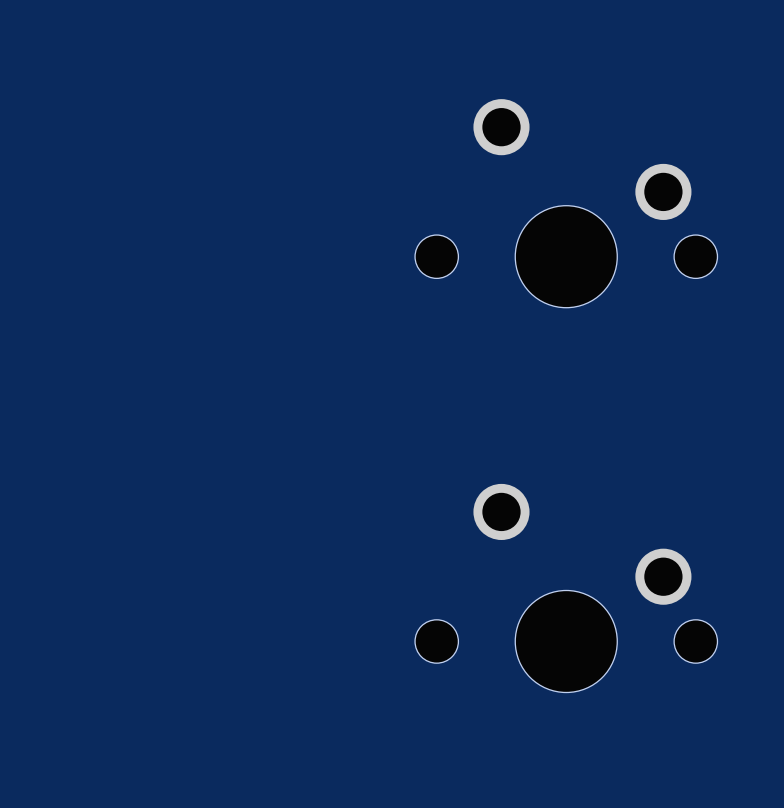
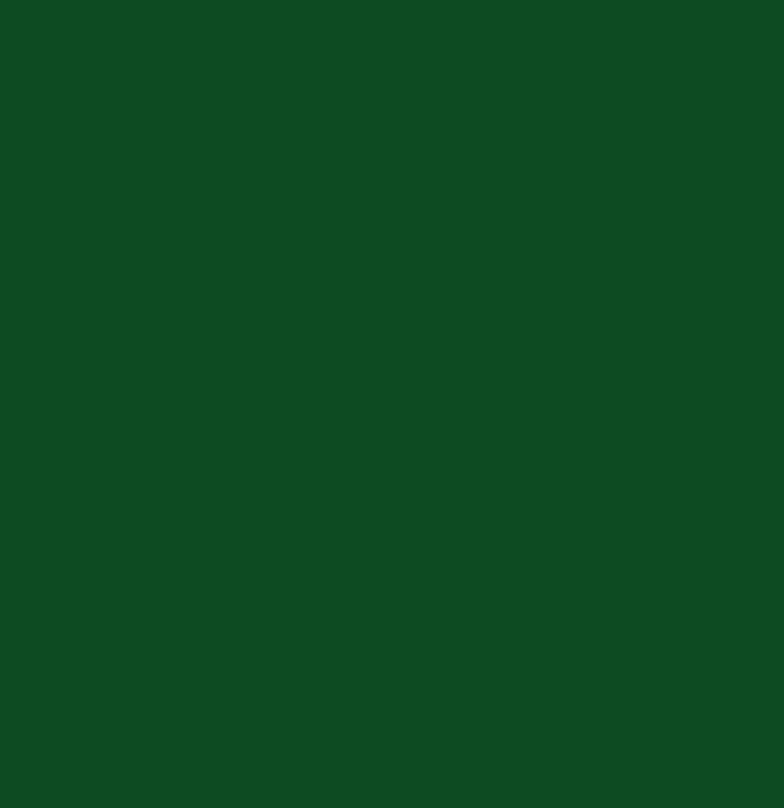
part: (566, 203) -> none
part: (566, 588) -> none

